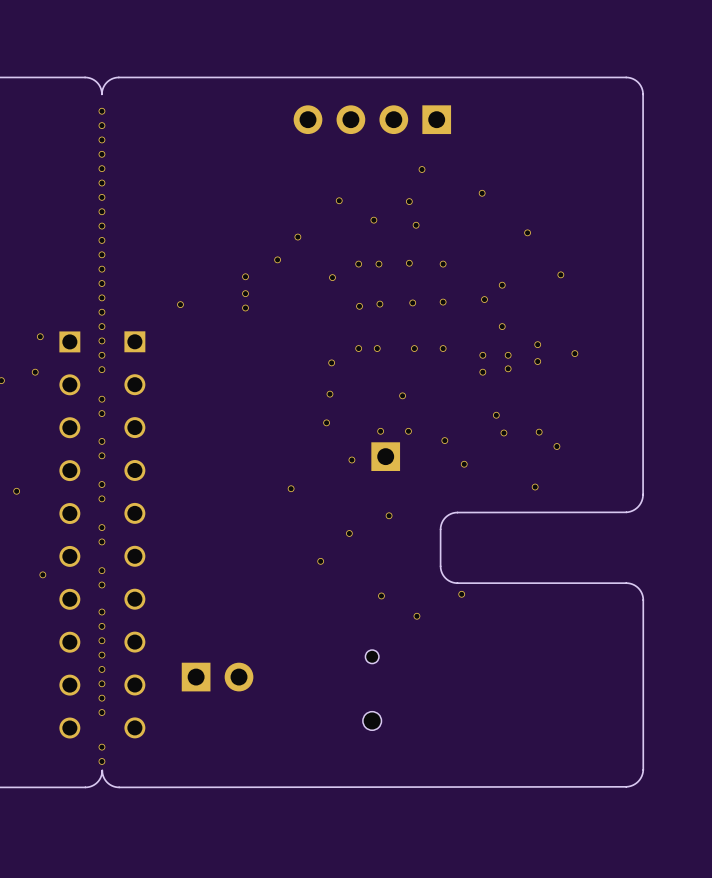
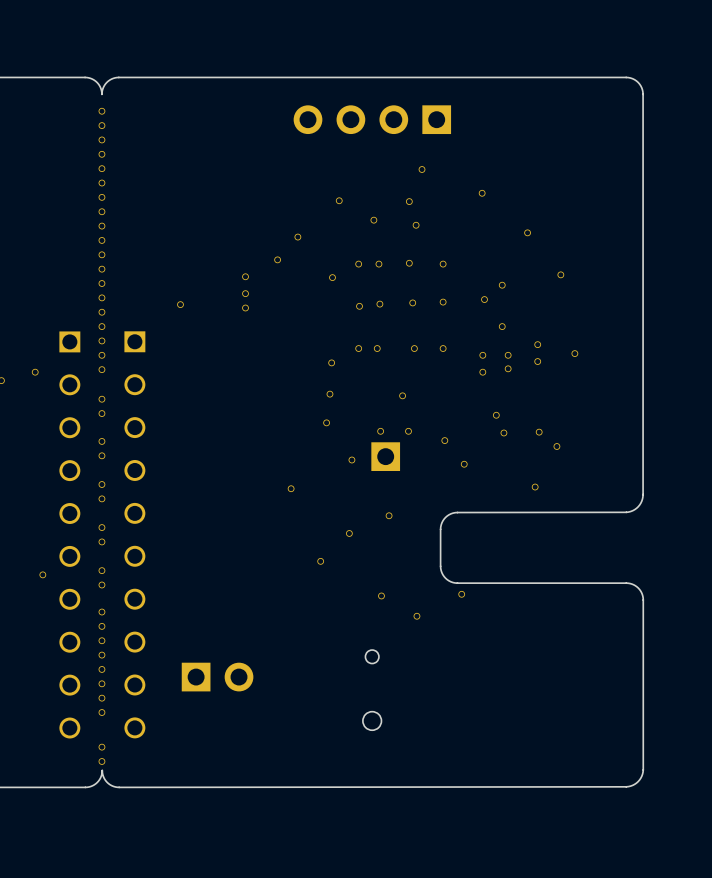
part: (40, 336) -> none
part: (16, 491) -> none

